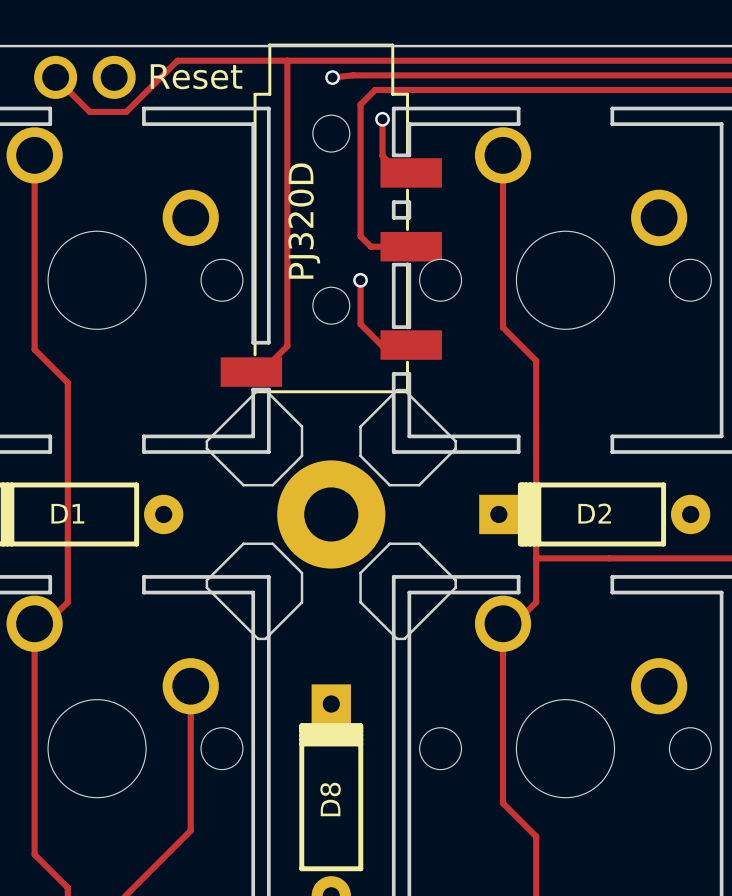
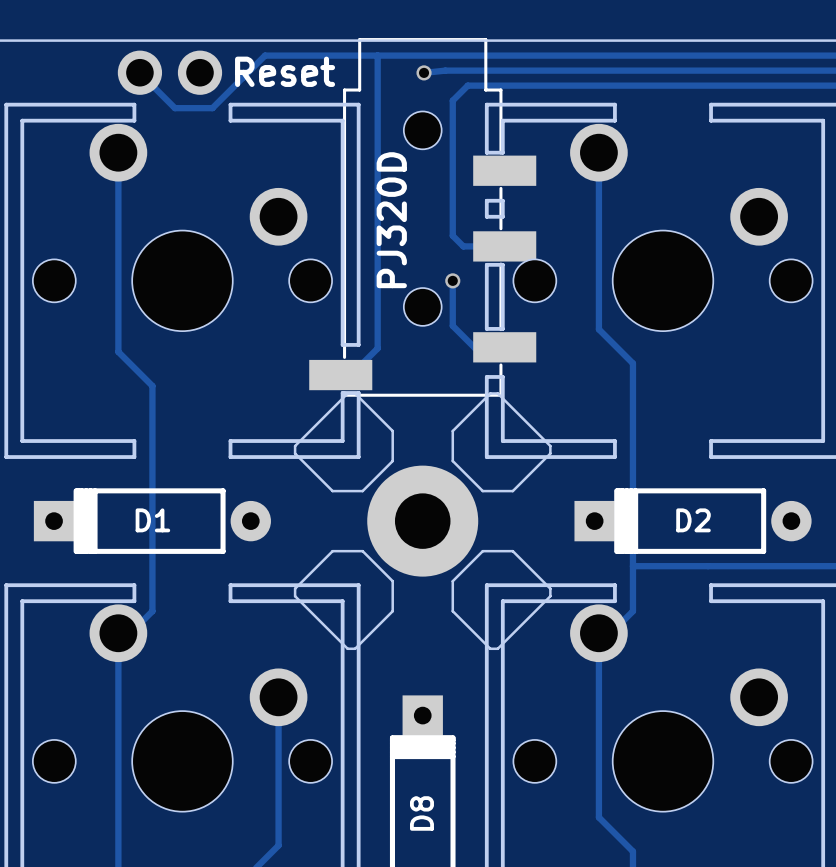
track: (382, 119) (382, 155) (399, 172) (411, 172) -> none
via: (382, 119) -> none

